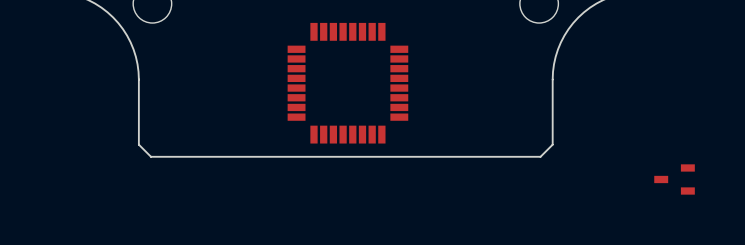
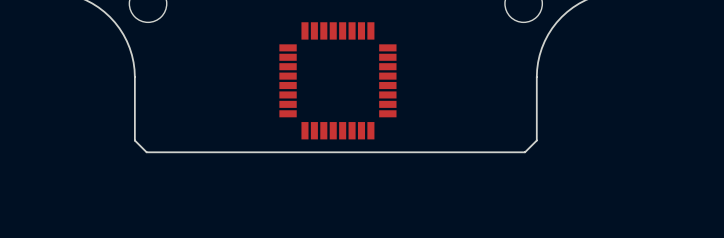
part: (674, 179) -> none

